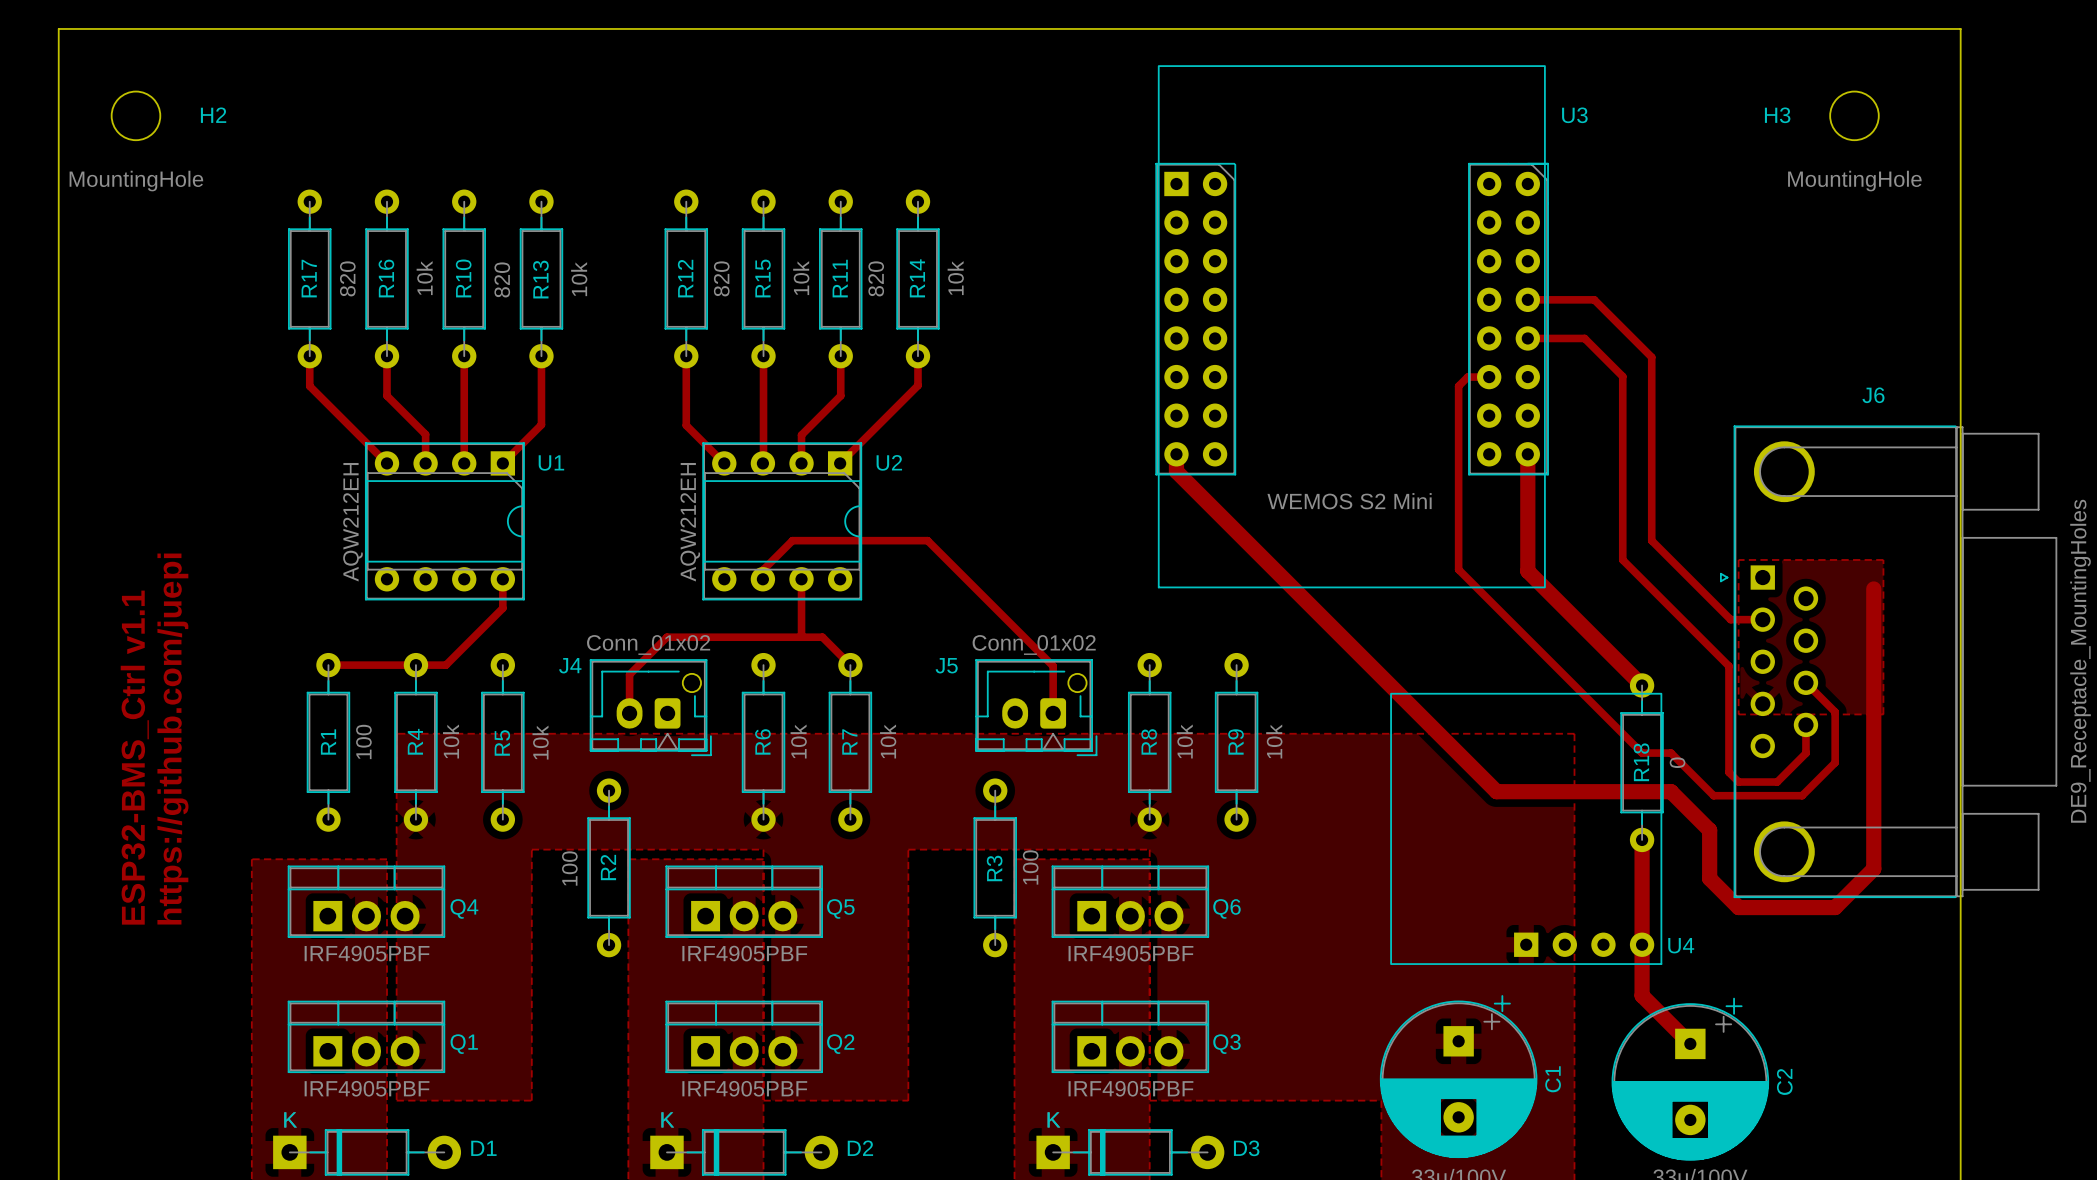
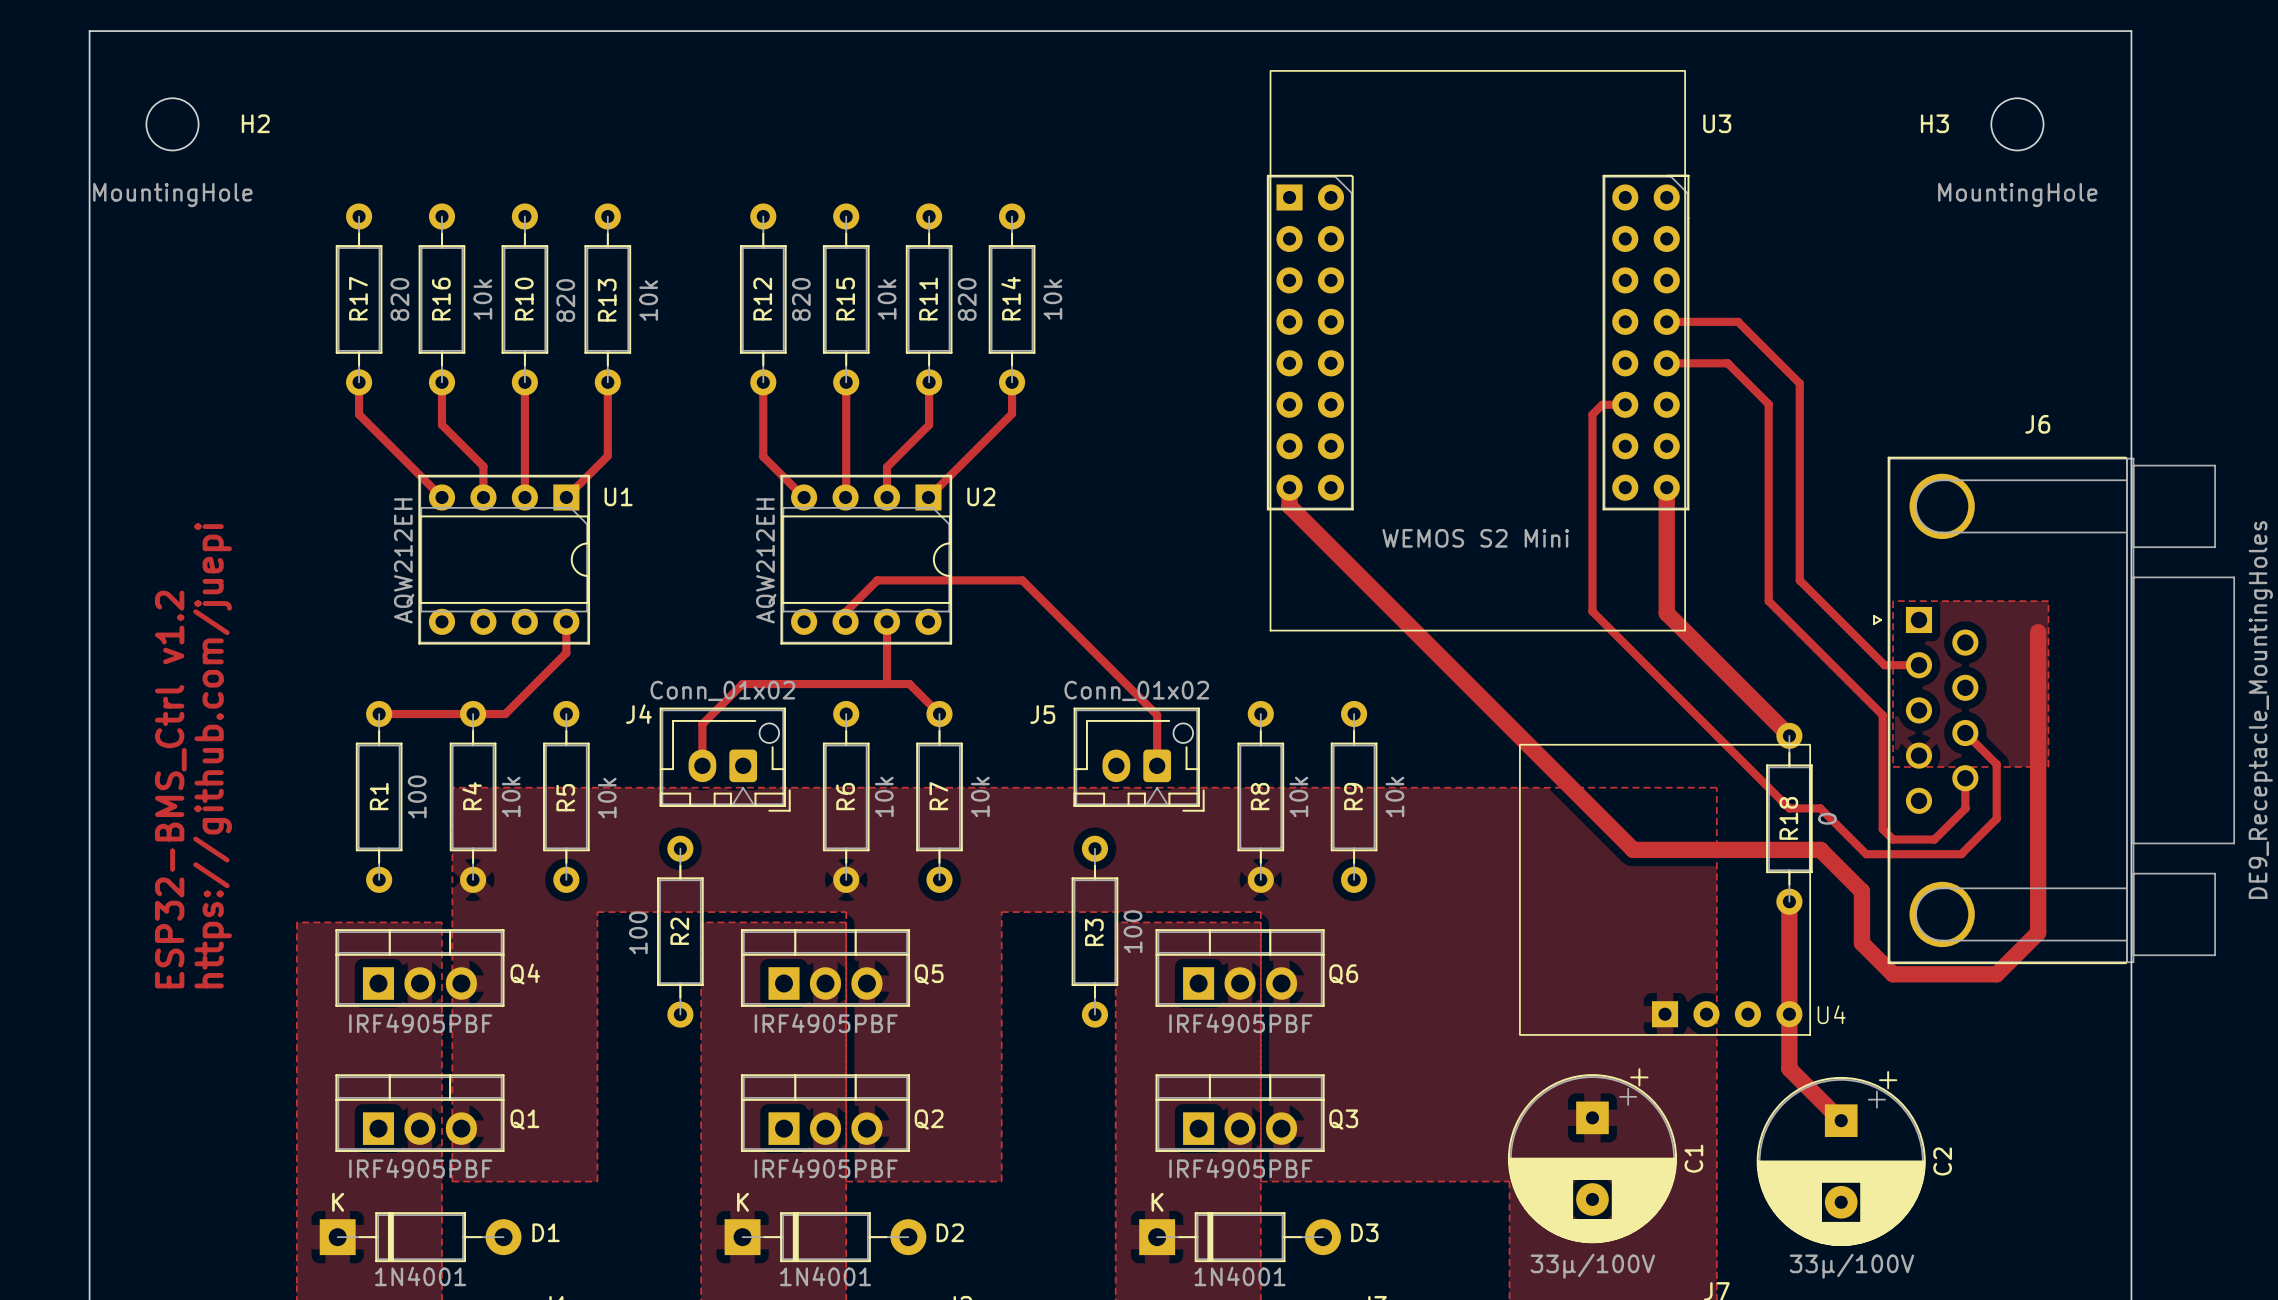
text: ESP32-BMS_Ctrl v1.1 (134, 757) -> ESP32-BMS_Ctrl v1.2 (170, 789)

